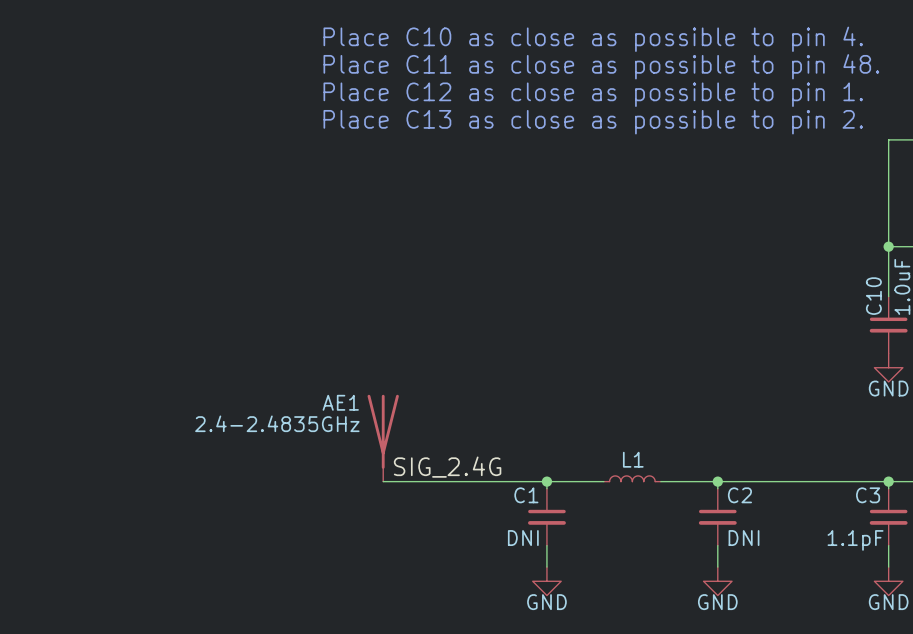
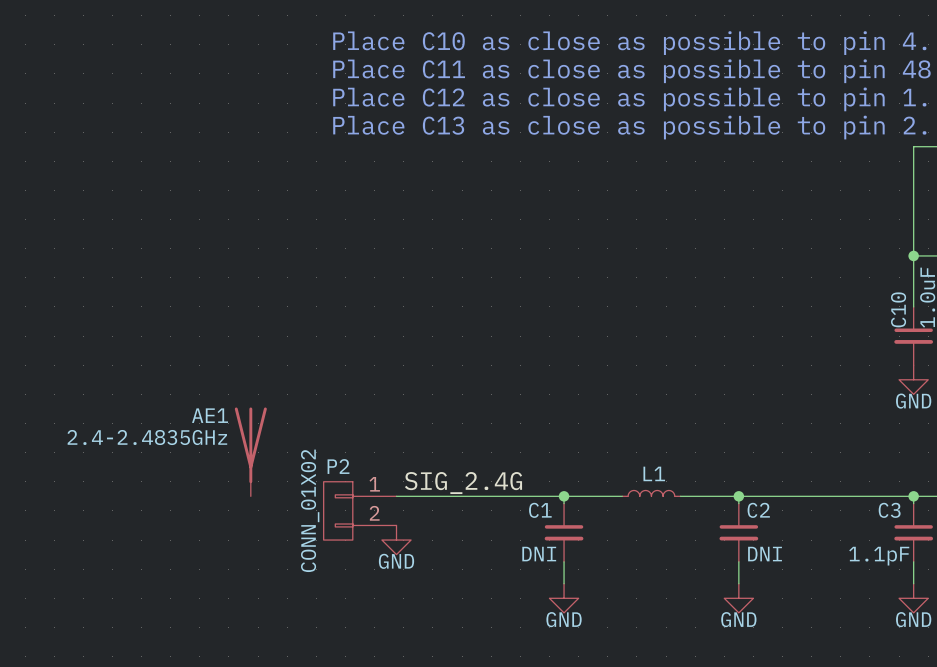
AE1 position: (383, 438) -> (250, 451)
P2: none -> CONN_01X02 (360, 510)
power symbol: none -> GND (396, 540)

